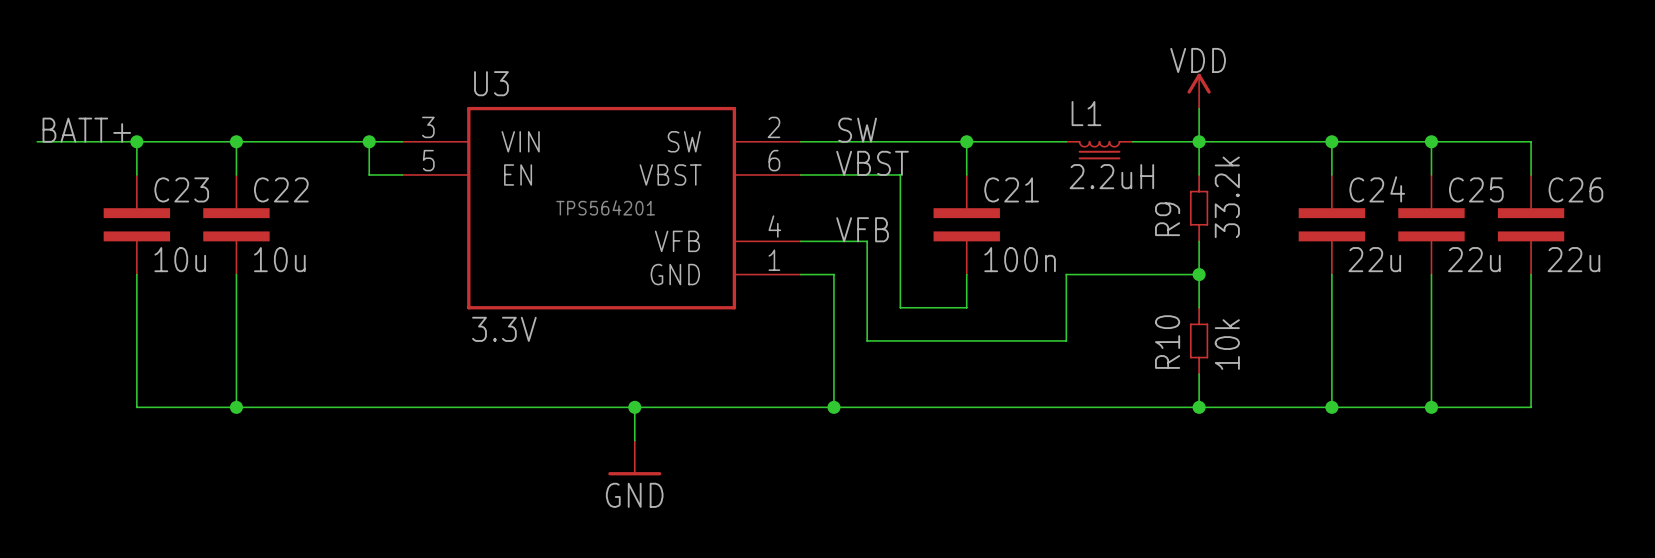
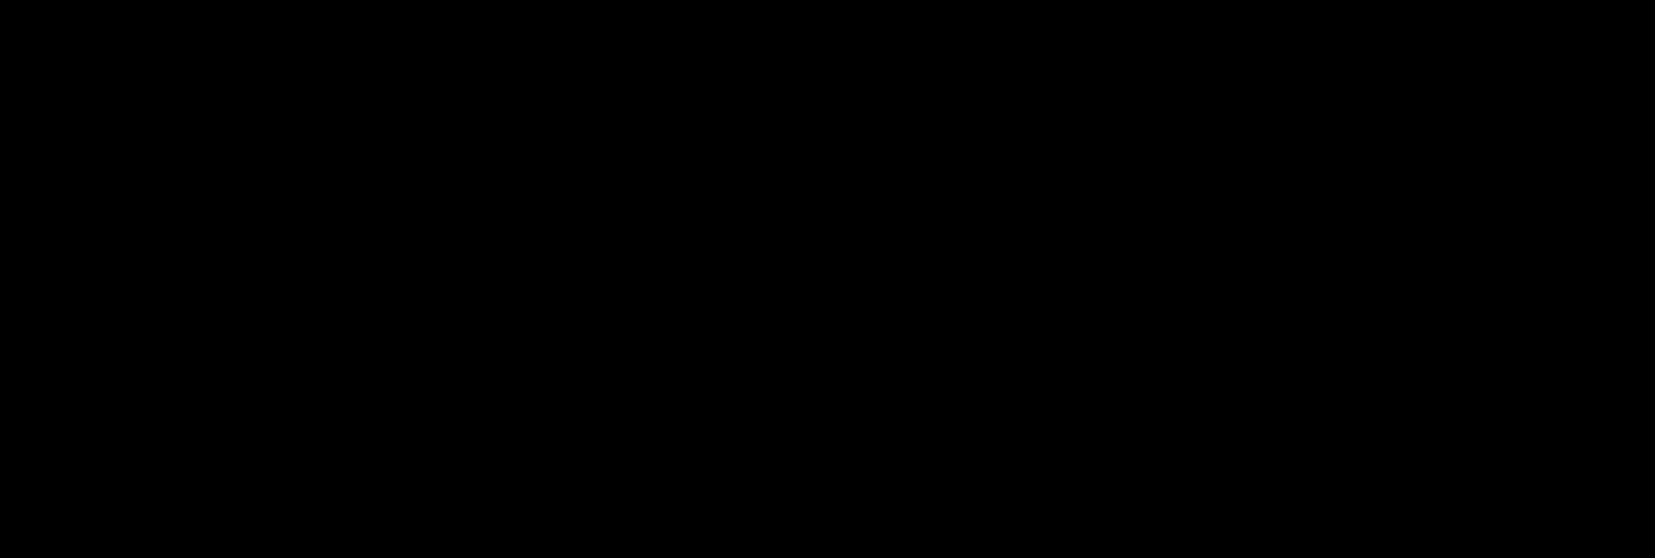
power symbol: VDD (1199, 91) -> none
wire: (1199, 108) (1199, 174) -> none
label: BATT+ (86, 130) -> none
label: SW (857, 130) -> none
wire: (37, 141) (402, 141) -> none
wire: (136, 141) (136, 174) -> none
junction: (136, 141) -> none
wire: (236, 141) (236, 174) -> none
junction: (236, 141) -> none
wire: (369, 141) (369, 174) (402, 174) -> none
junction: (369, 141) -> none
wire: (800, 141) (1066, 141) -> none
wire: (966, 141) (966, 174) -> none
junction: (966, 141) -> none
wire: (1132, 141) (1531, 141) (1531, 174) -> none
junction: (1199, 141) -> none
wire: (1331, 141) (1331, 174) -> none
junction: (1331, 141) -> none
wire: (1431, 141) (1431, 174) -> none
junction: (1431, 141) -> none
L1: 2.2uH (1099, 150) -> none
label: VBST (872, 163) -> none
wire: (800, 174) (900, 174) (900, 307) (966, 307) (966, 274) -> none
U3: 3.3V (601, 208) -> none
R9: 33.2k (1199, 208) -> none
C23: 10u (136, 224) -> none
C22: 10u (236, 224) -> none
C21: 100n (966, 224) -> none
C24: 22u (1331, 224) -> none
C25: 22u (1431, 224) -> none
C26: 22u (1531, 224) -> none
label: VFB (862, 229) -> none
wire: (800, 241) (867, 241) (867, 340) (1066, 340) (1066, 274) (1199, 274) -> none
wire: (1199, 241) (1199, 307) -> none
wire: (136, 274) (136, 407) (1531, 407) (1531, 274) -> none
wire: (236, 274) (236, 407) -> none
wire: (800, 274) (833, 274) (833, 407) -> none
junction: (1199, 274) -> none
wire: (1331, 274) (1331, 407) -> none
wire: (1431, 274) (1431, 407) -> none
R10: 10k (1199, 340) -> none
wire: (1199, 374) (1199, 407) -> none
junction: (236, 407) -> none
wire: (634, 407) (634, 440) -> none
junction: (634, 407) -> none
junction: (833, 407) -> none
junction: (1199, 407) -> none
junction: (1331, 407) -> none
junction: (1431, 407) -> none
power symbol: GND (634, 457) -> none

